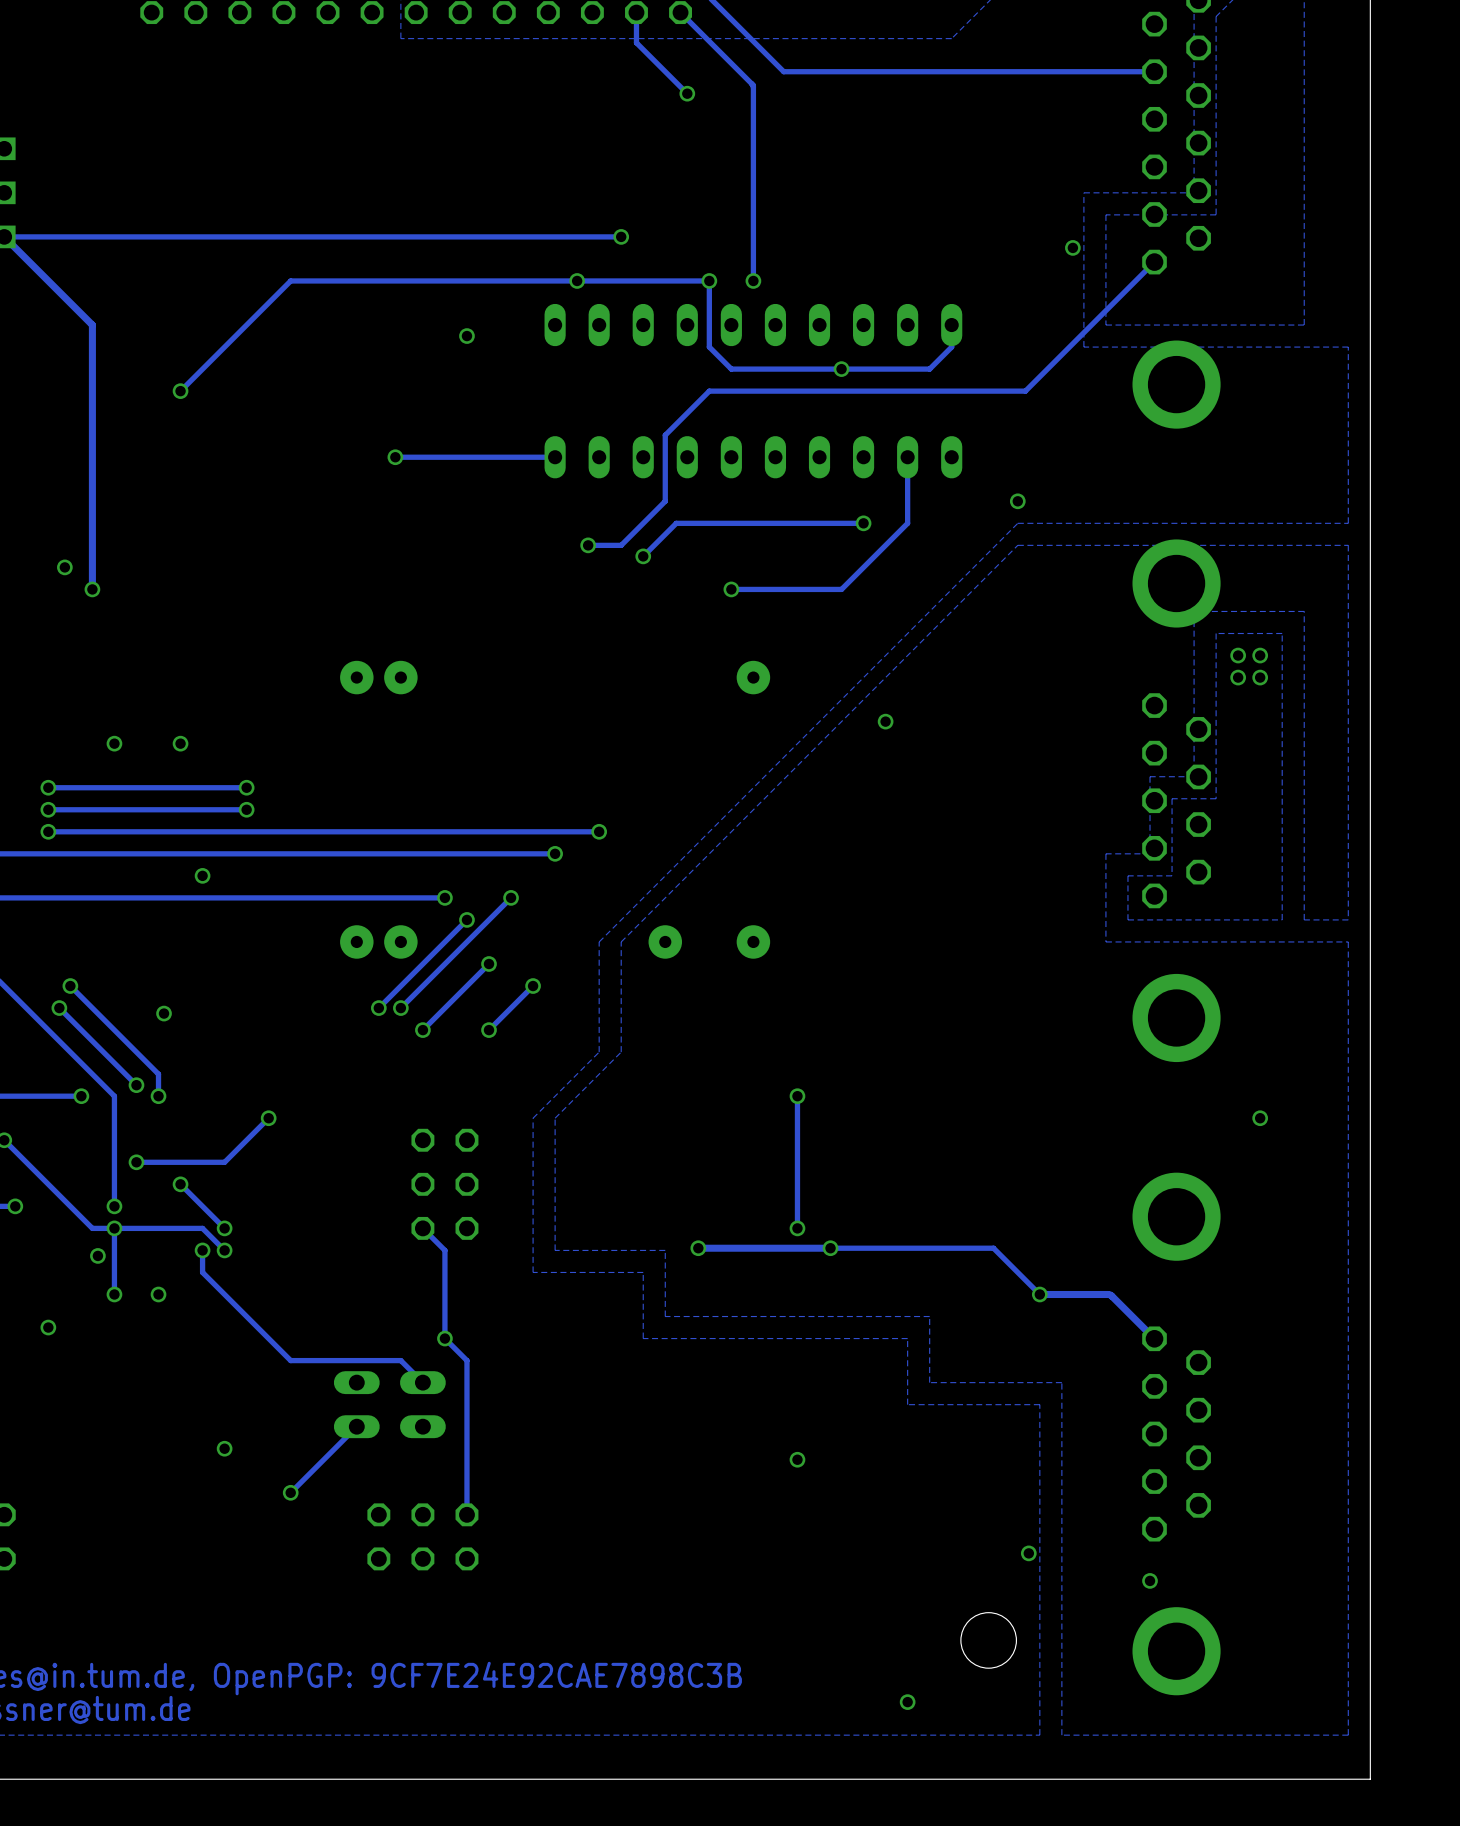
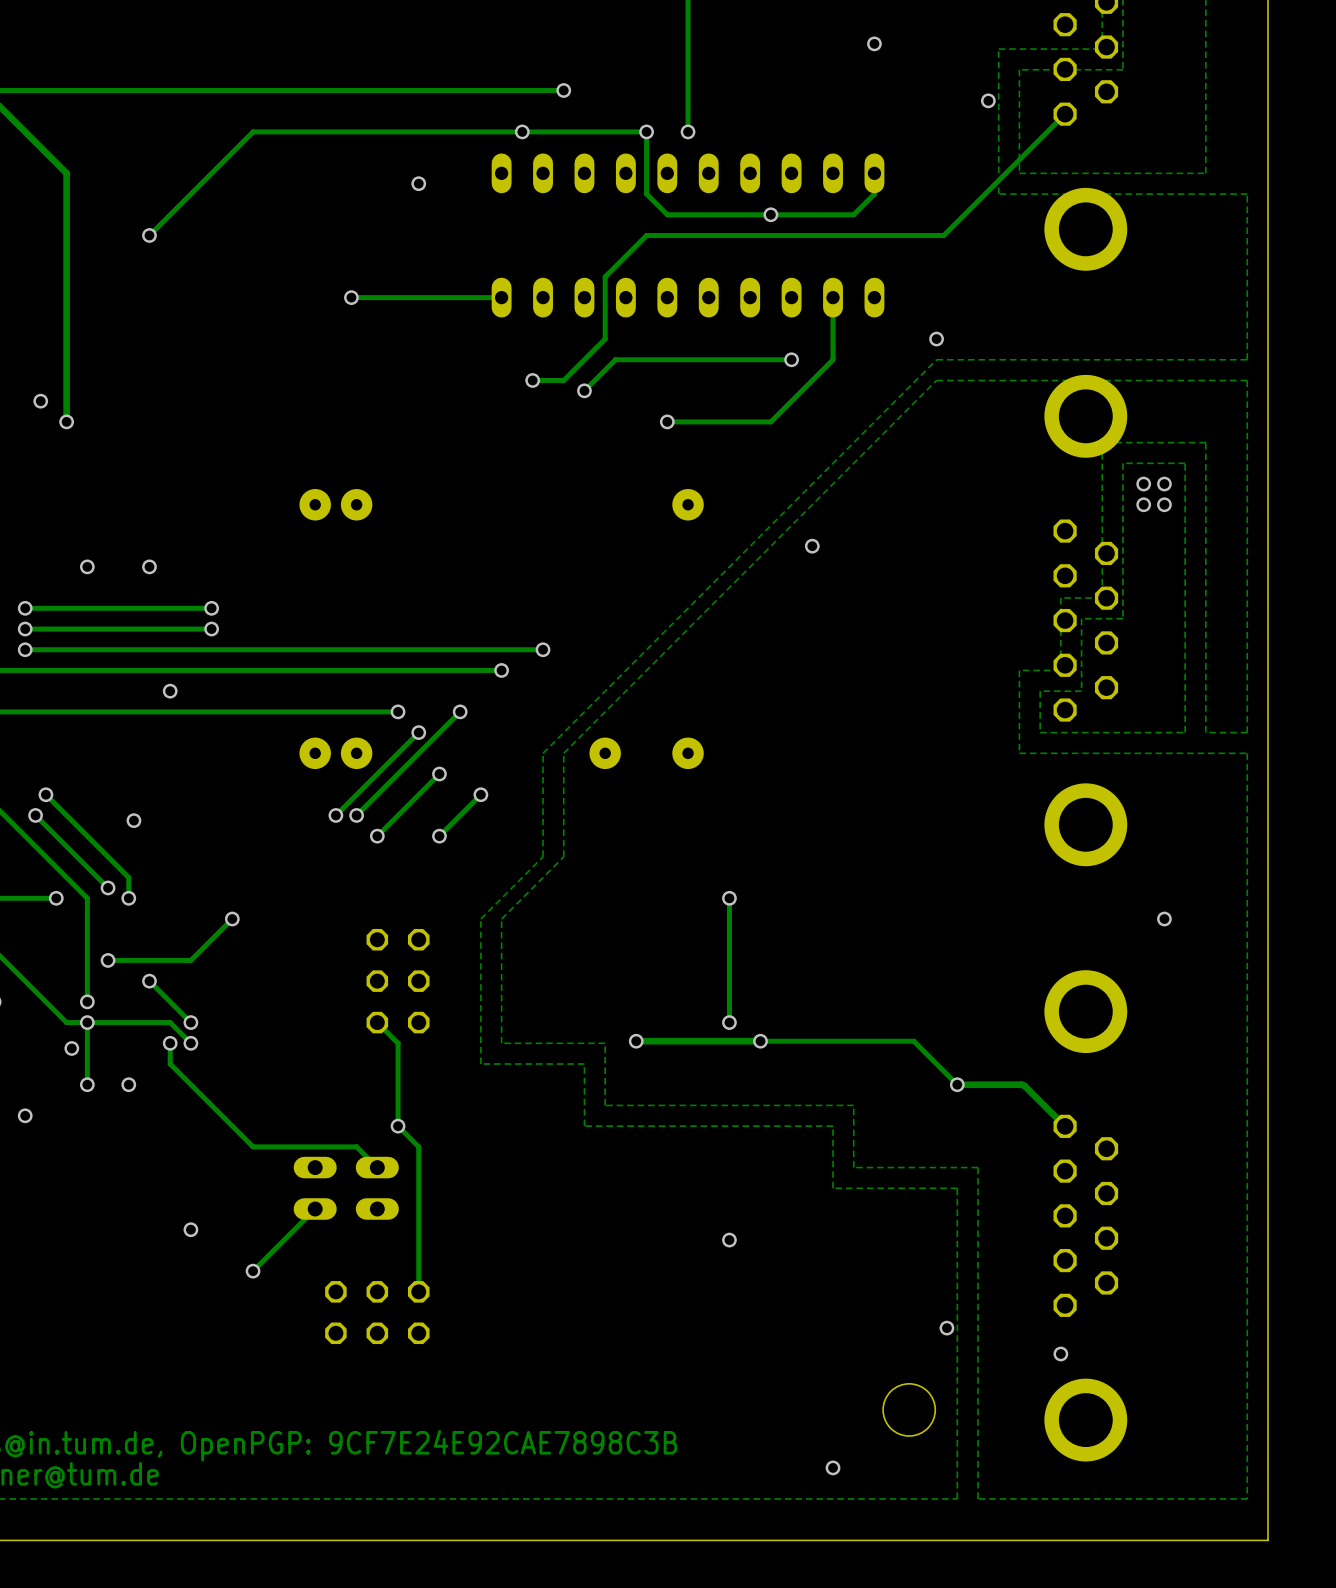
via: none -> (874, 43)

